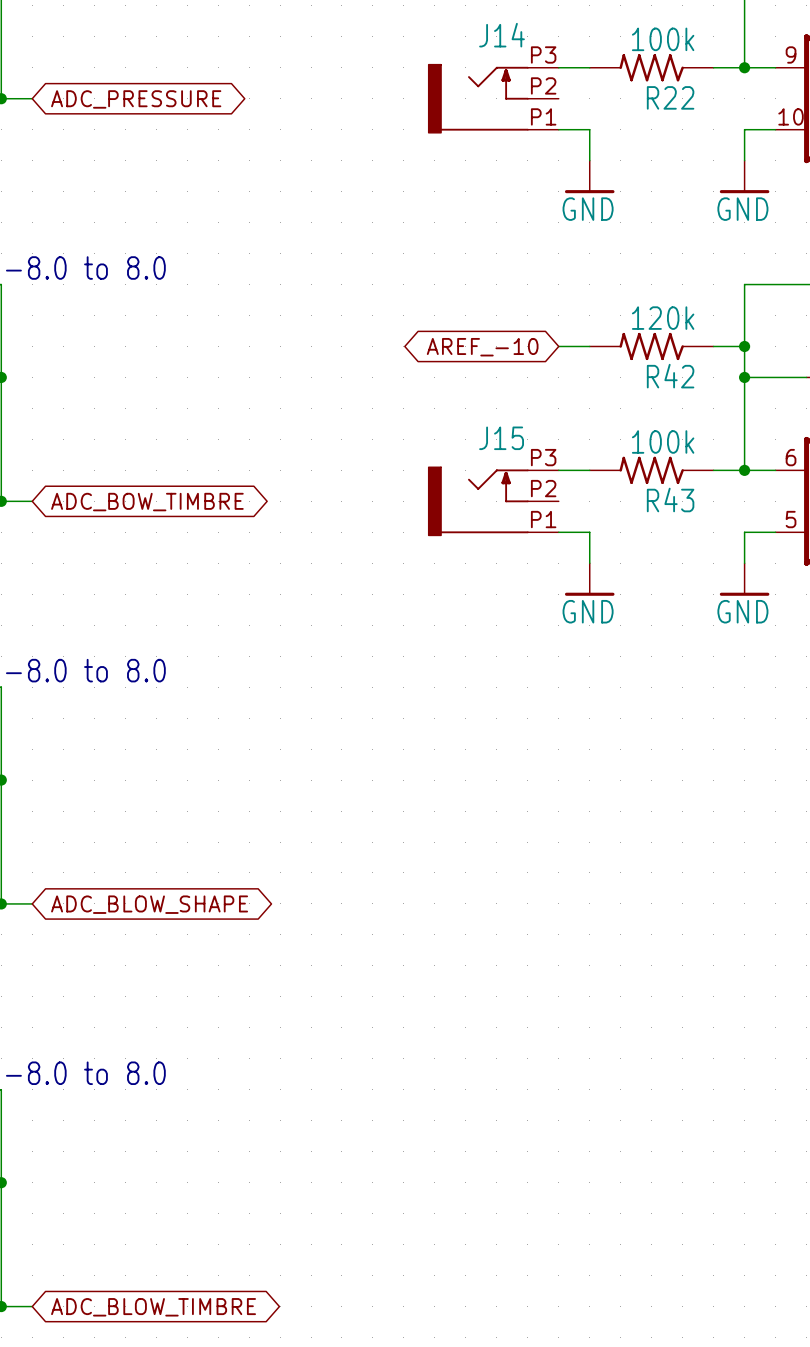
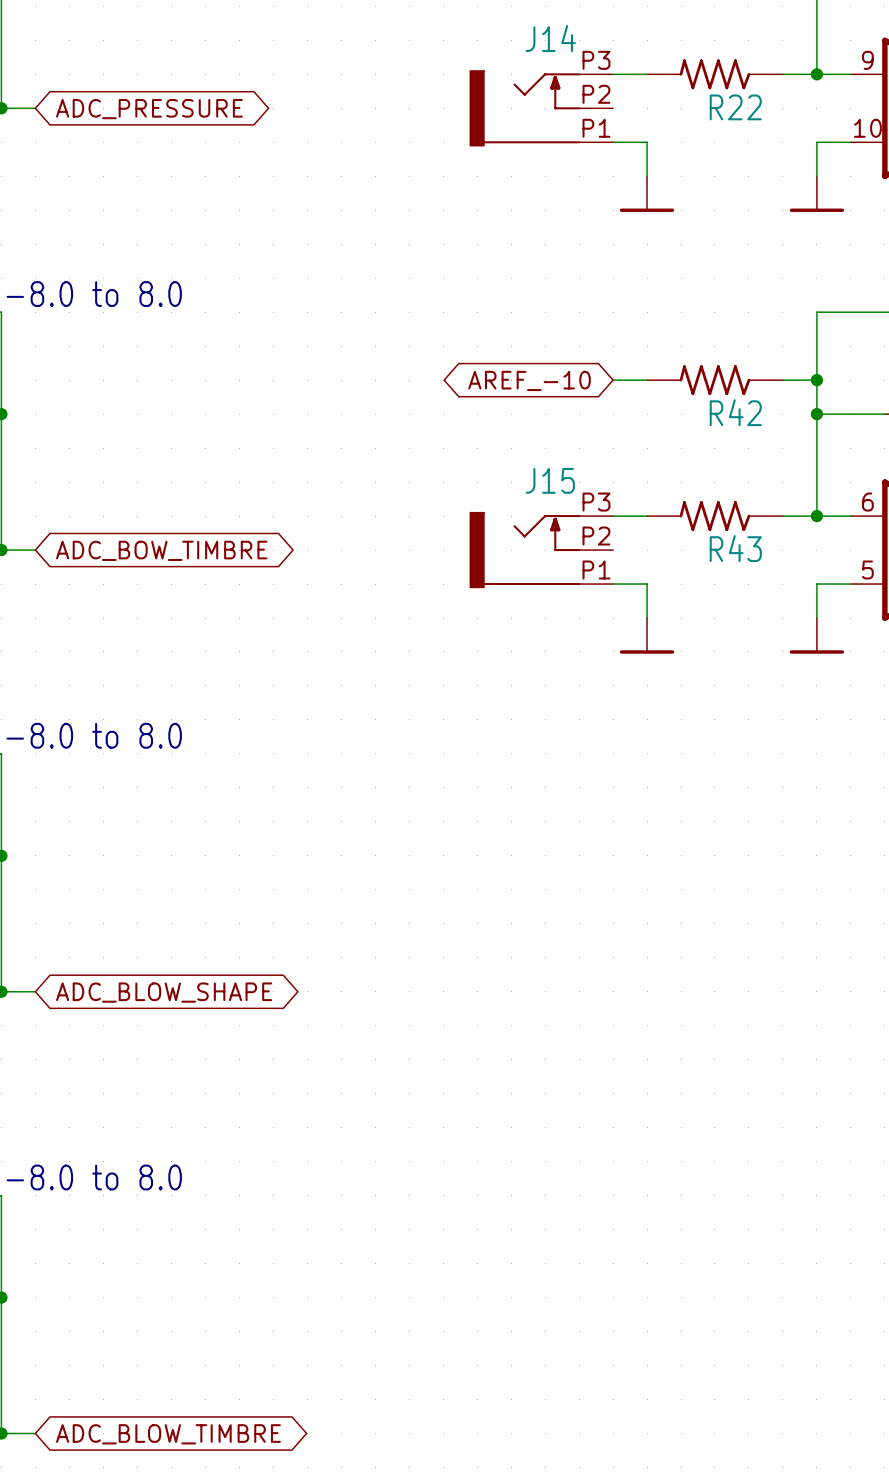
R22 value: 100k (663, 39) -> none
power symbol text: GND (588, 209) -> none
power symbol text: GND (742, 209) -> none
R42 value: 120k (663, 318) -> none
R43 value: 100k (663, 441) -> none
power symbol text: GND (588, 611) -> none
power symbol text: GND (742, 611) -> none

